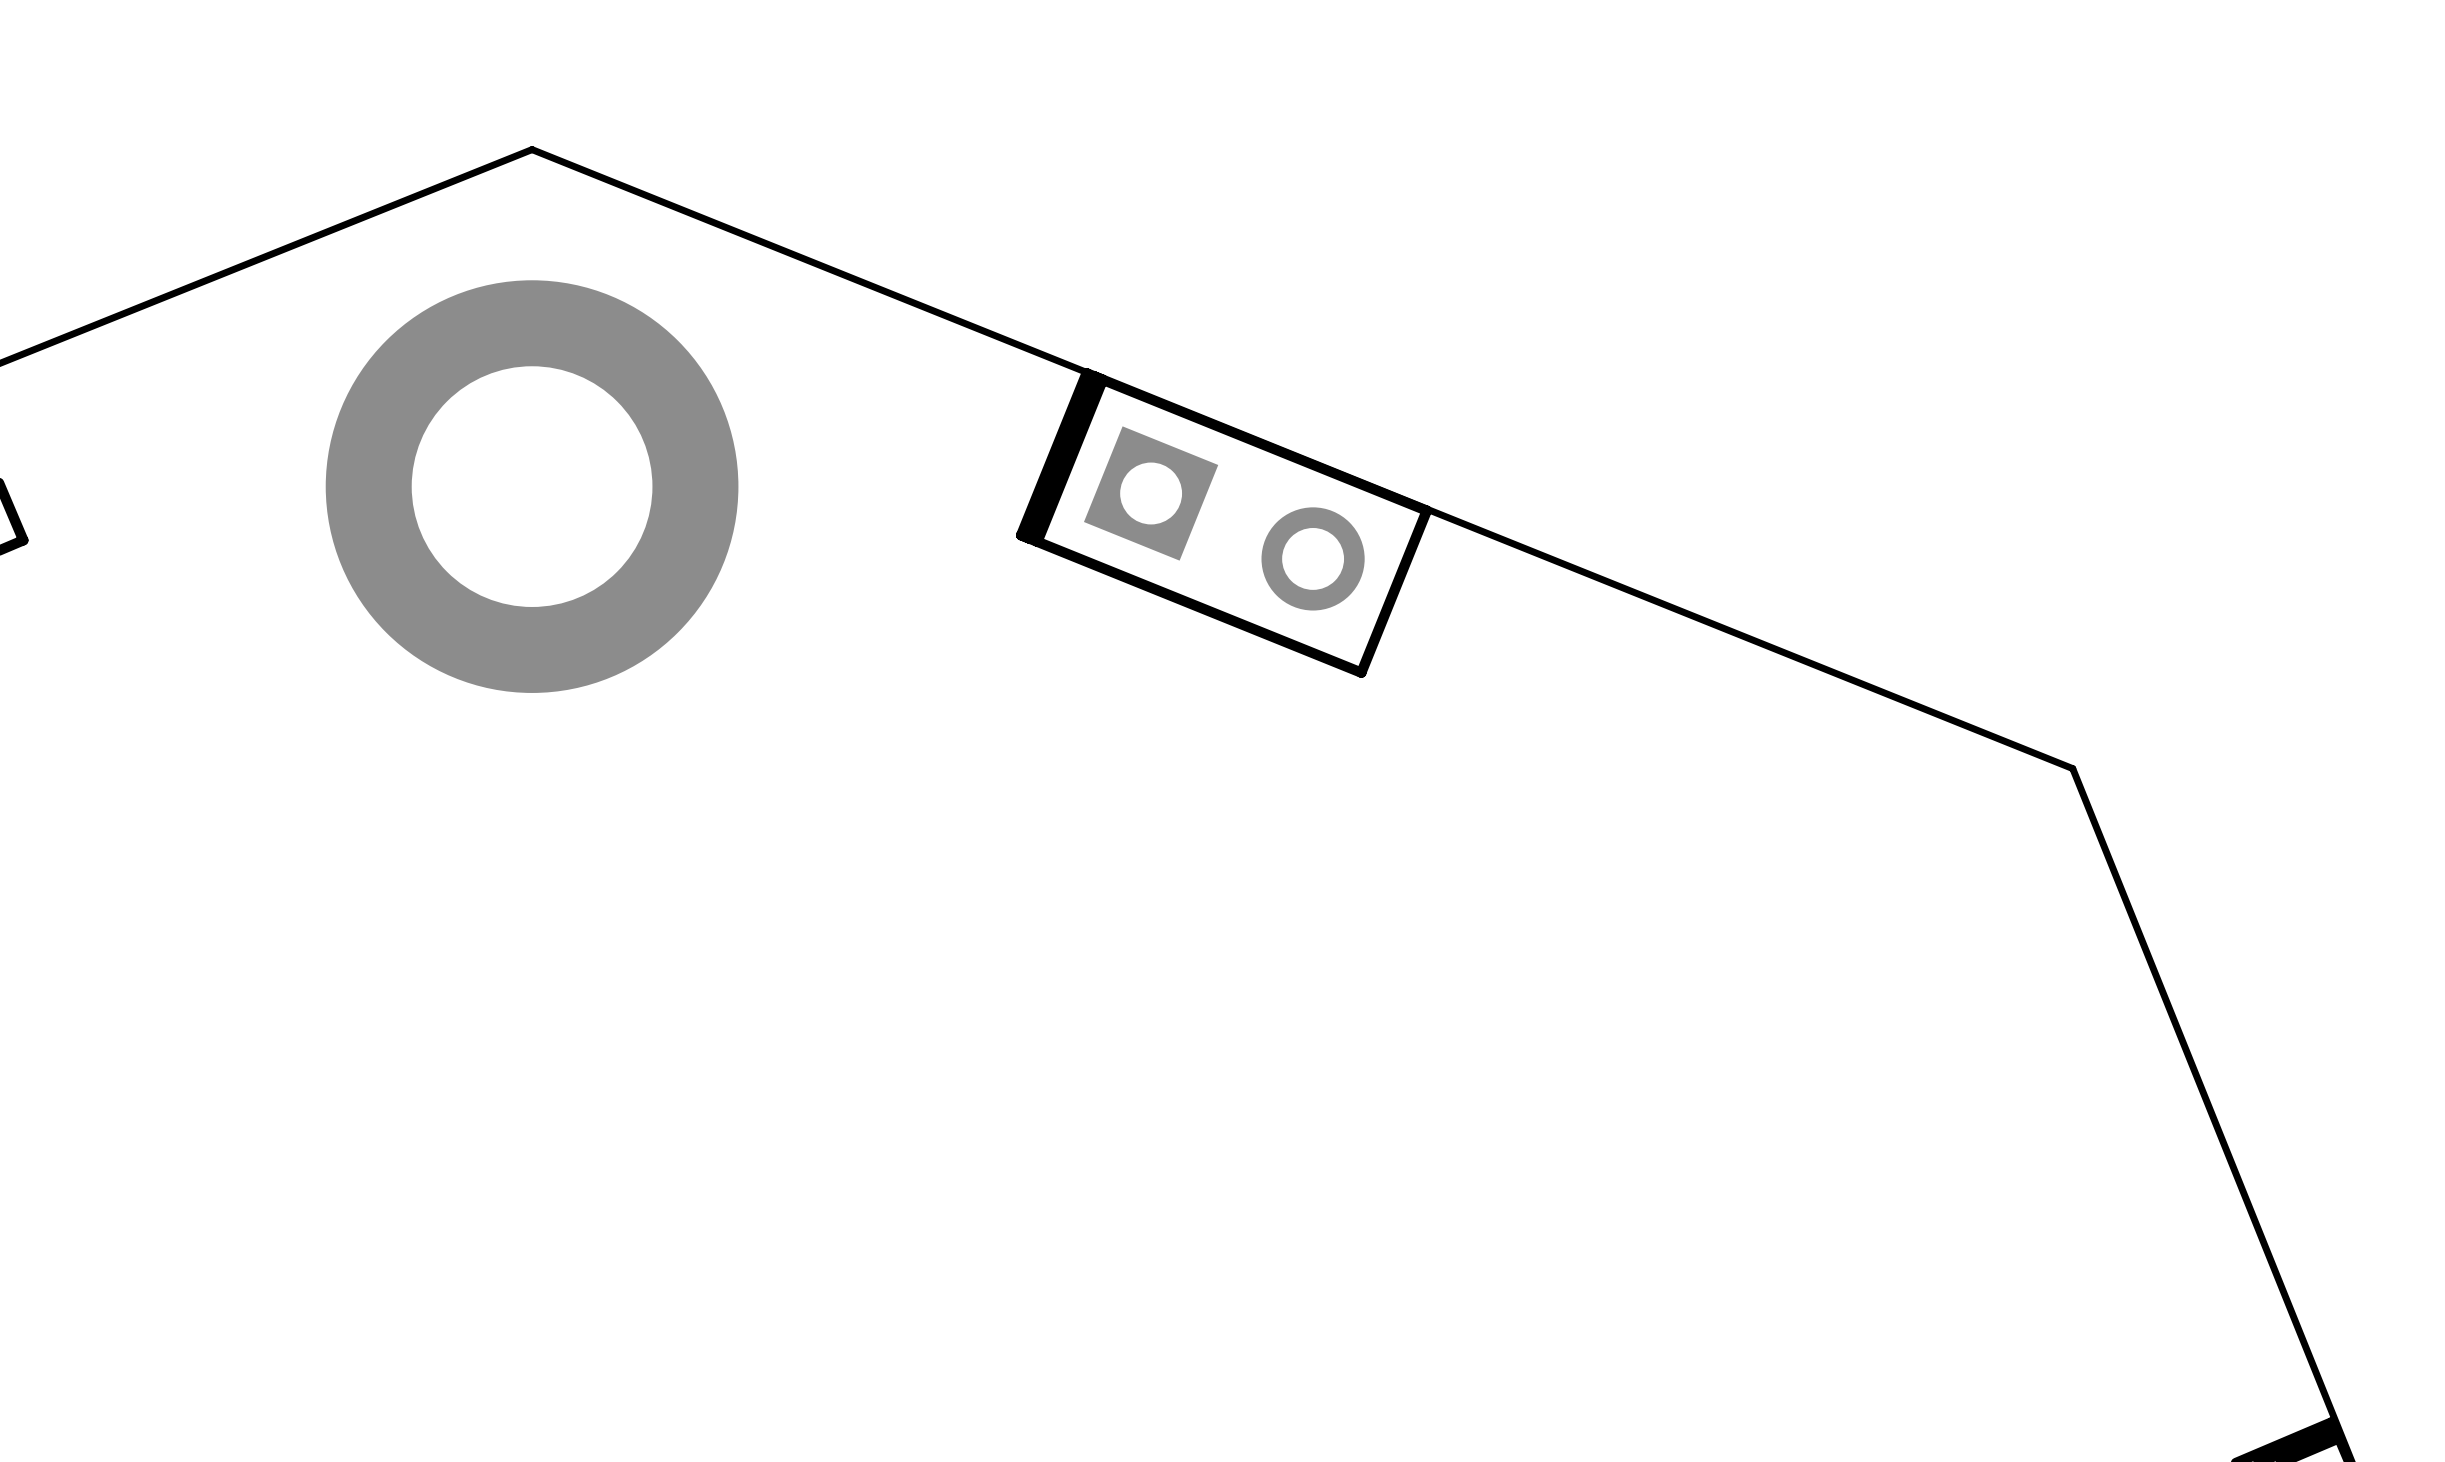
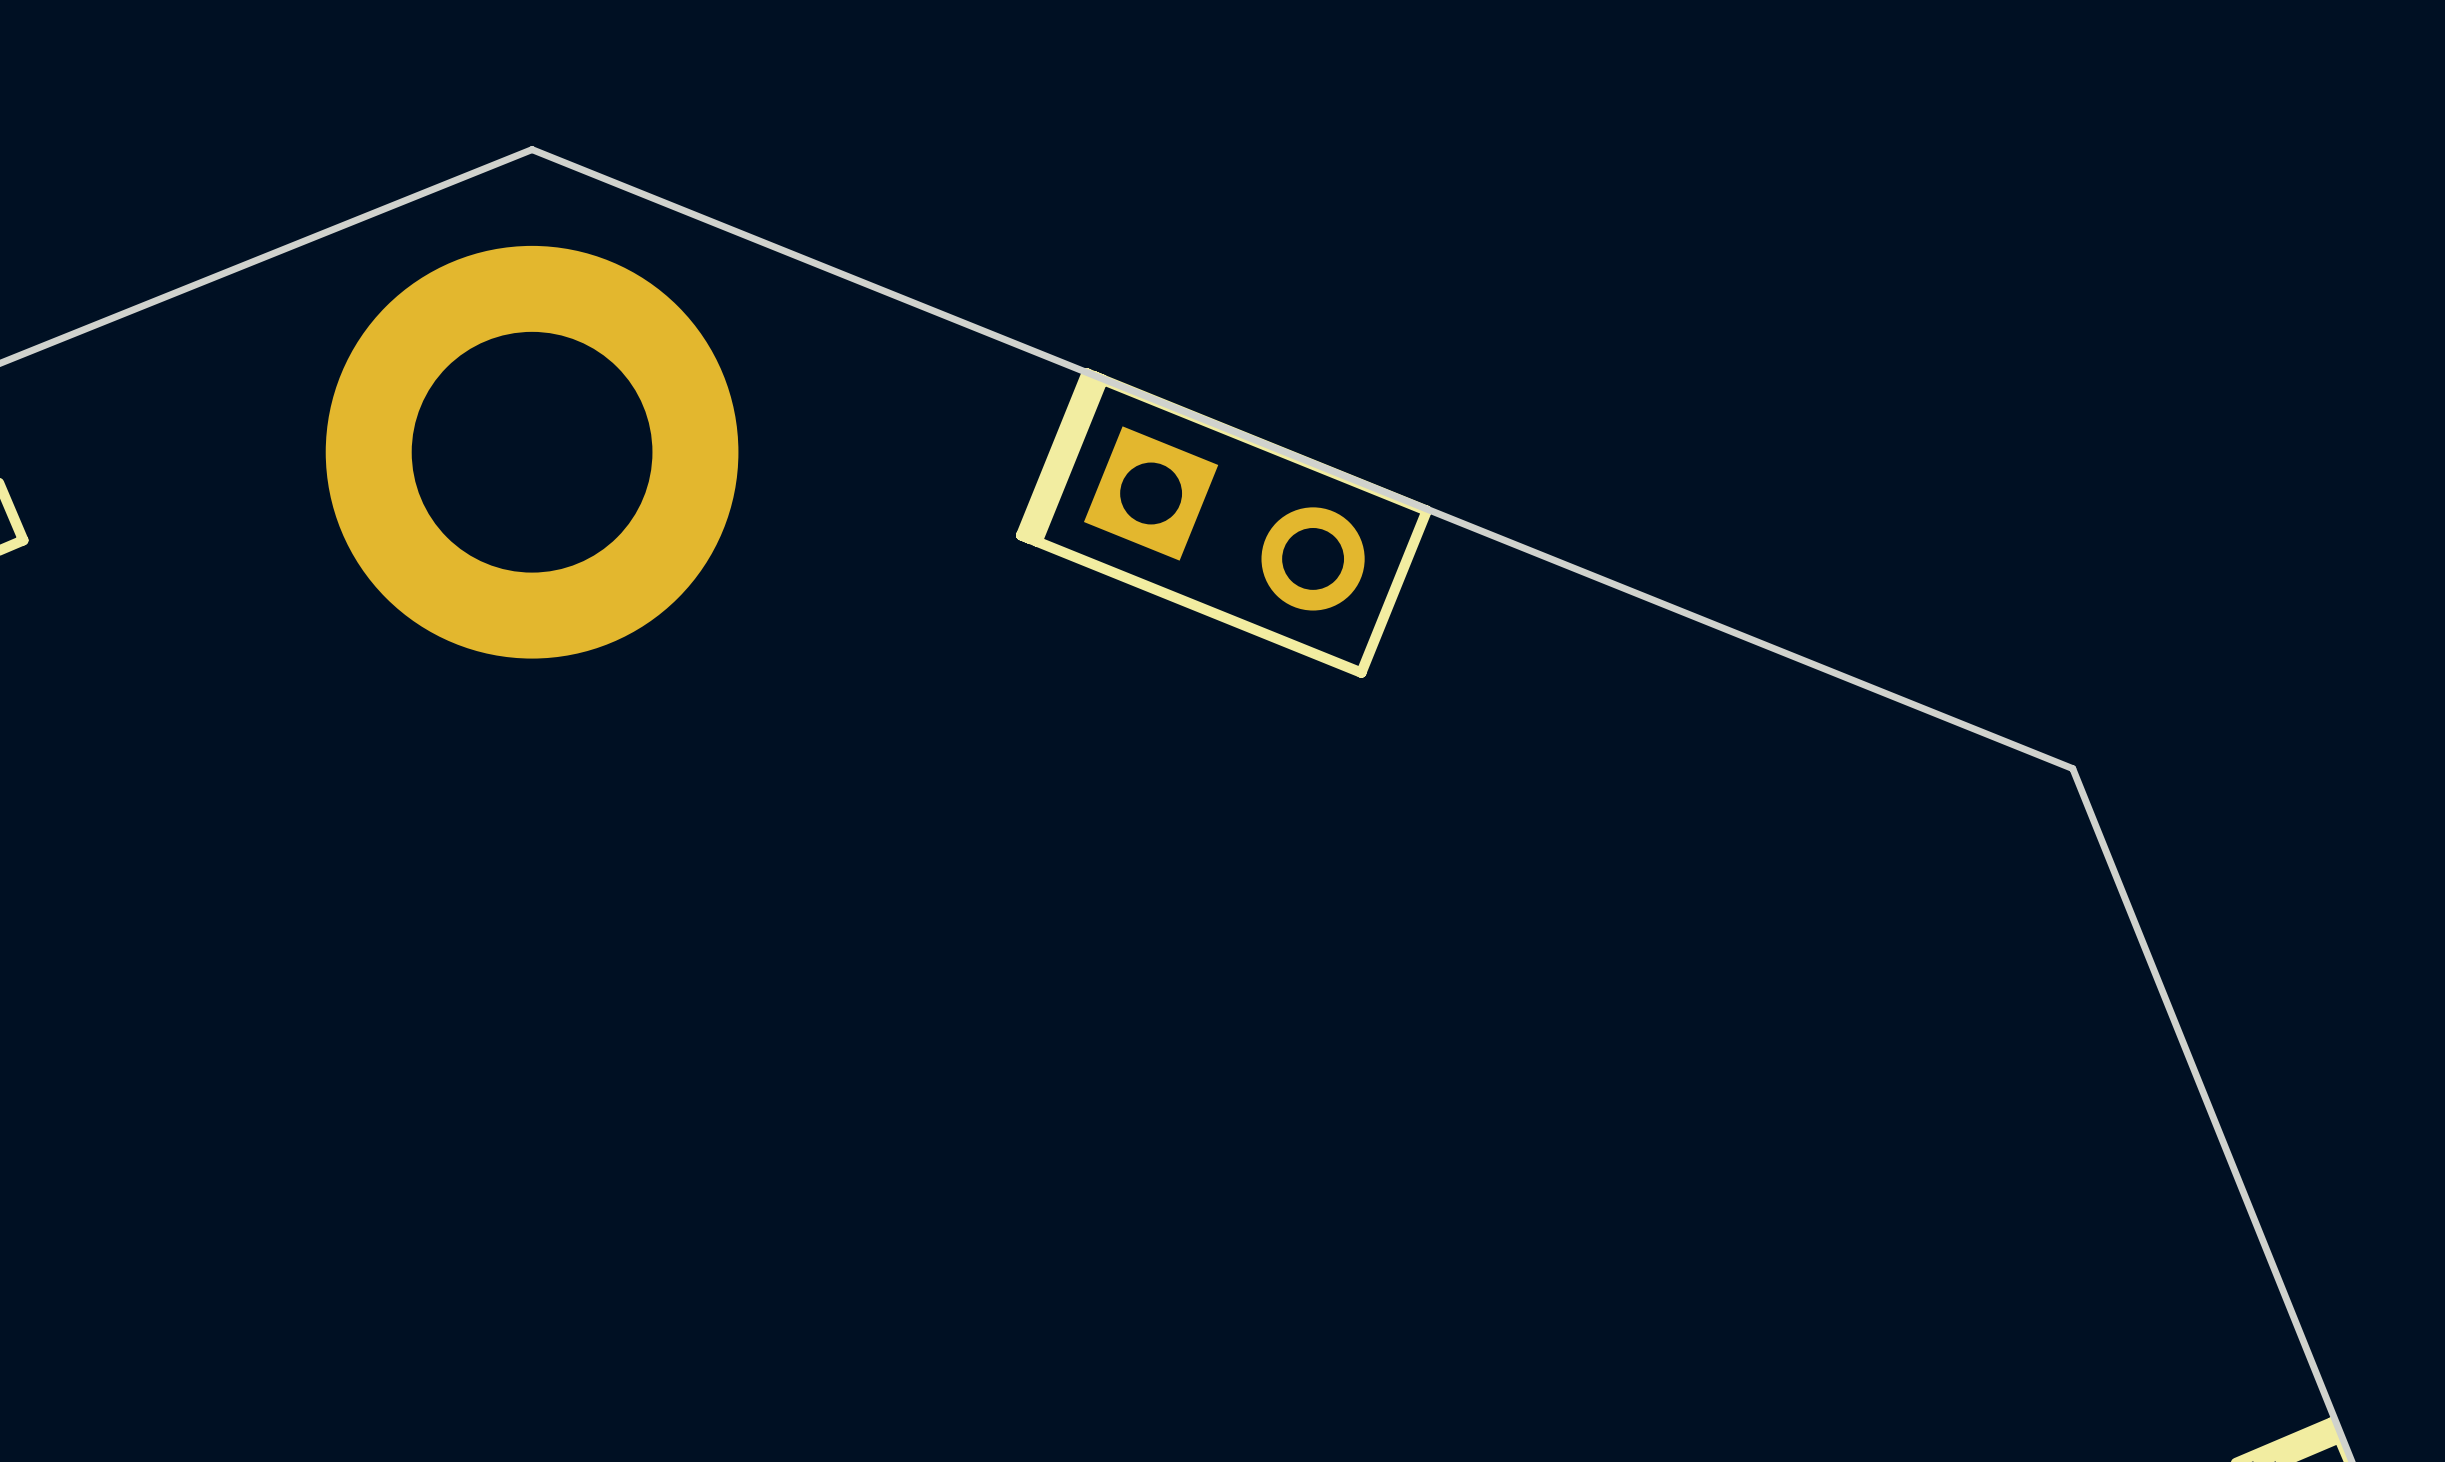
part position: (532, 486) -> (532, 452)

